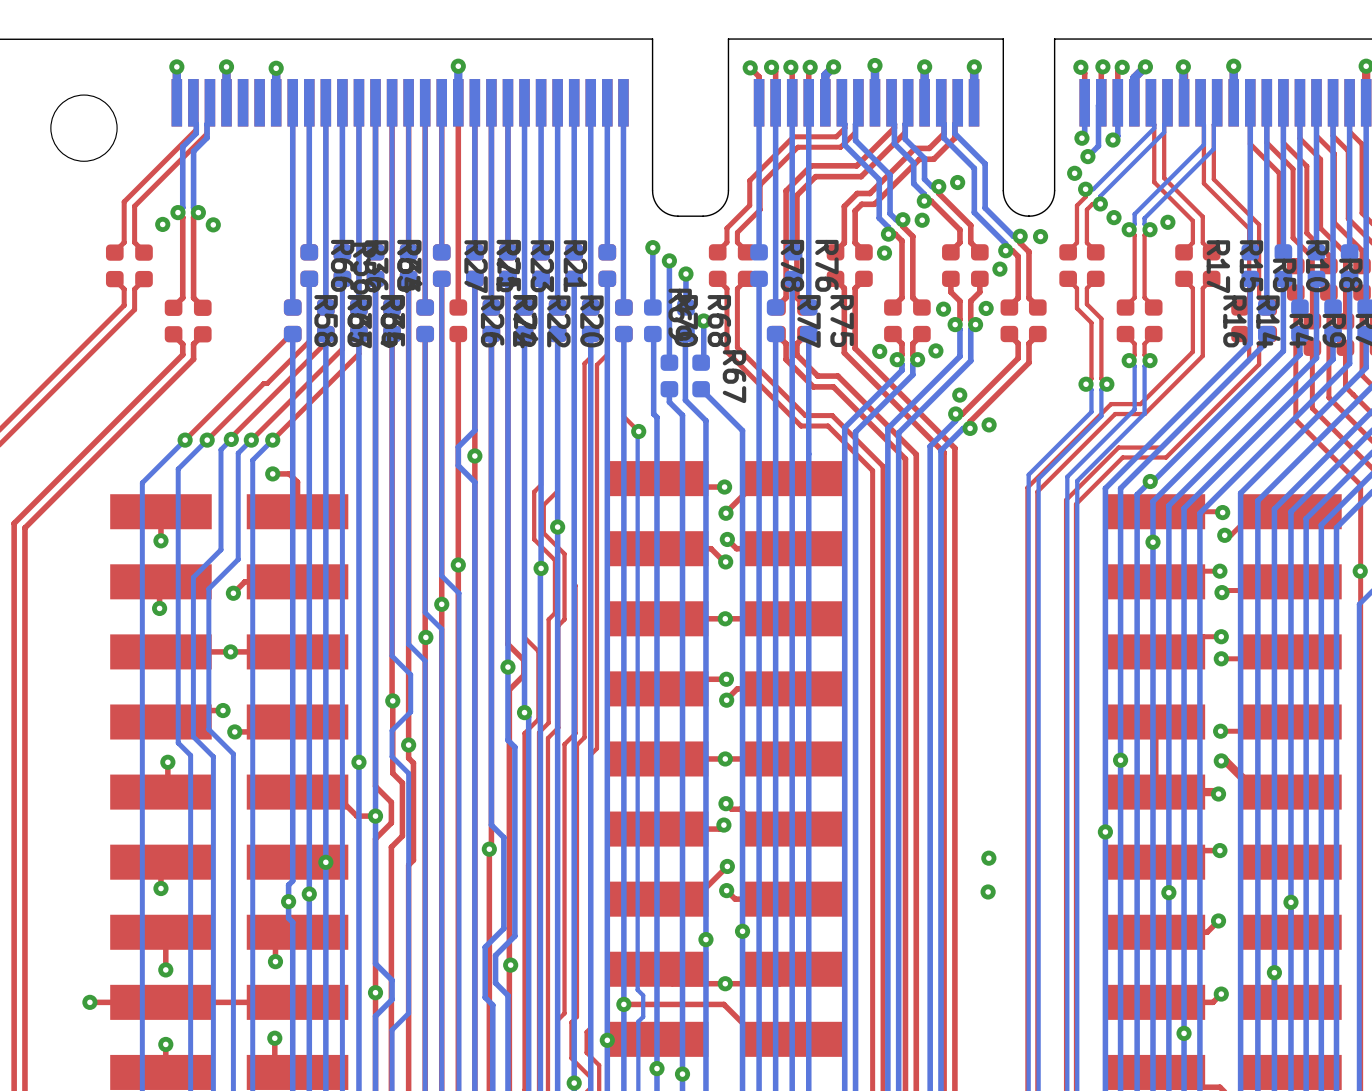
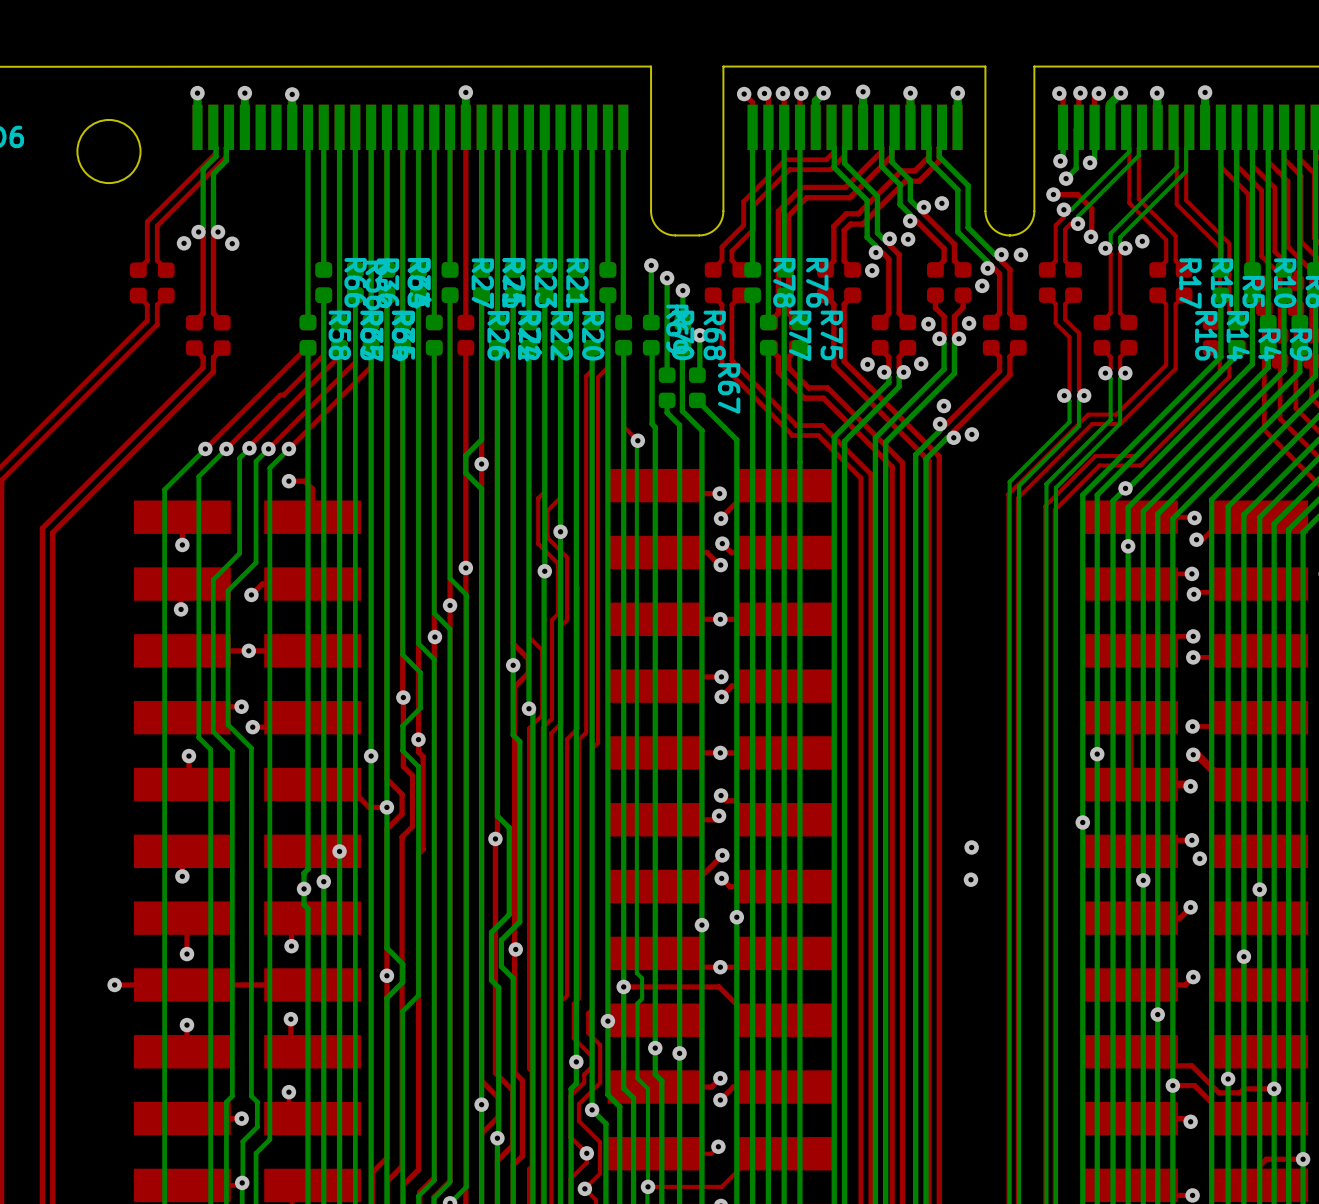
top track: none -> (1053, 194) (1077, 194) (1091, 208) (1090, 236)
via: none -> (1199, 858)

